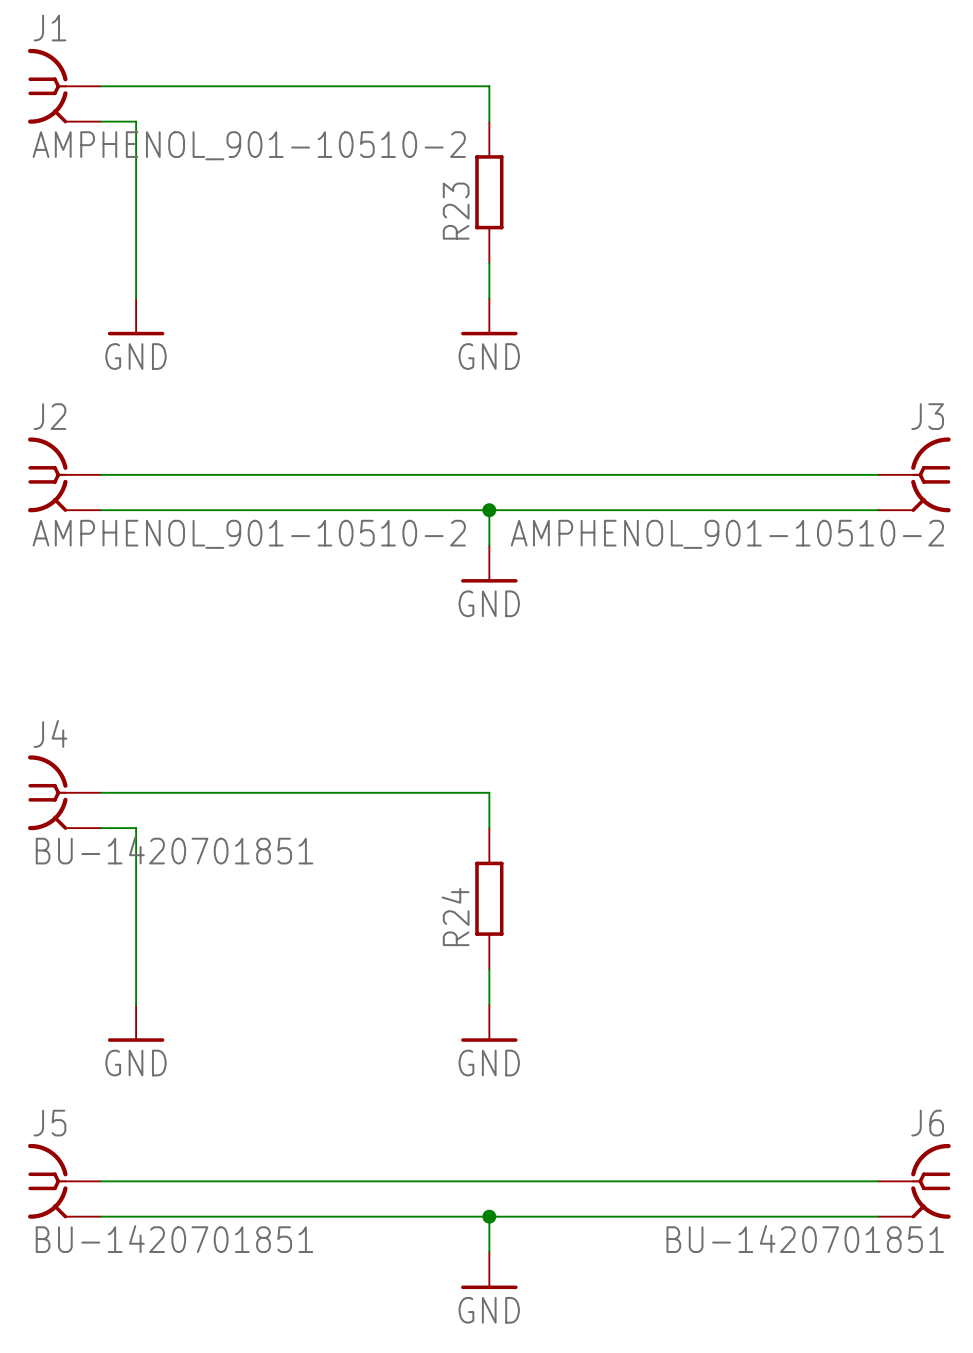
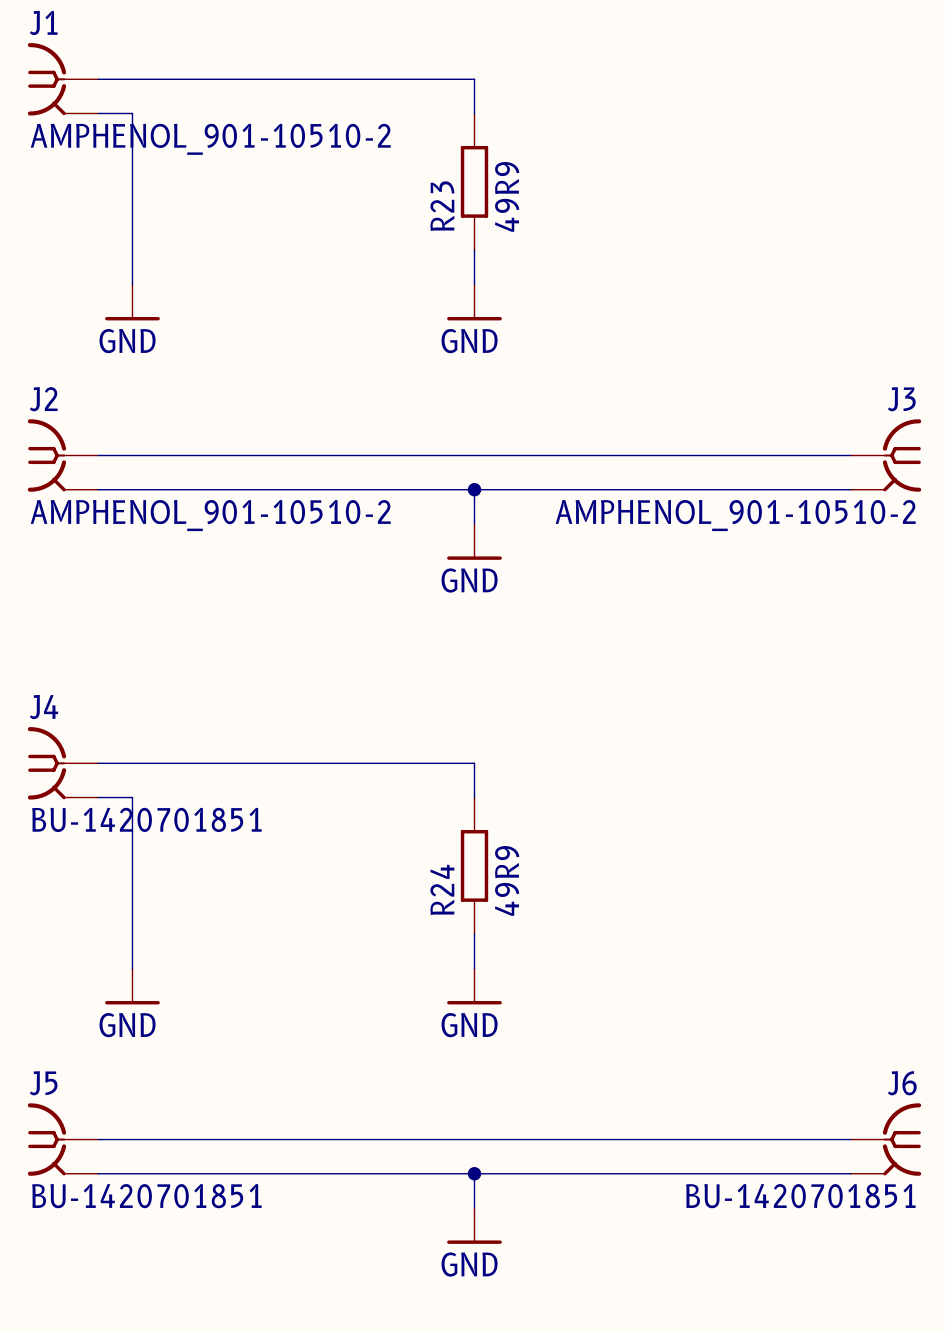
R23 value: none -> 49R9 (507, 196)
R24 value: none -> 49R9 (507, 880)

